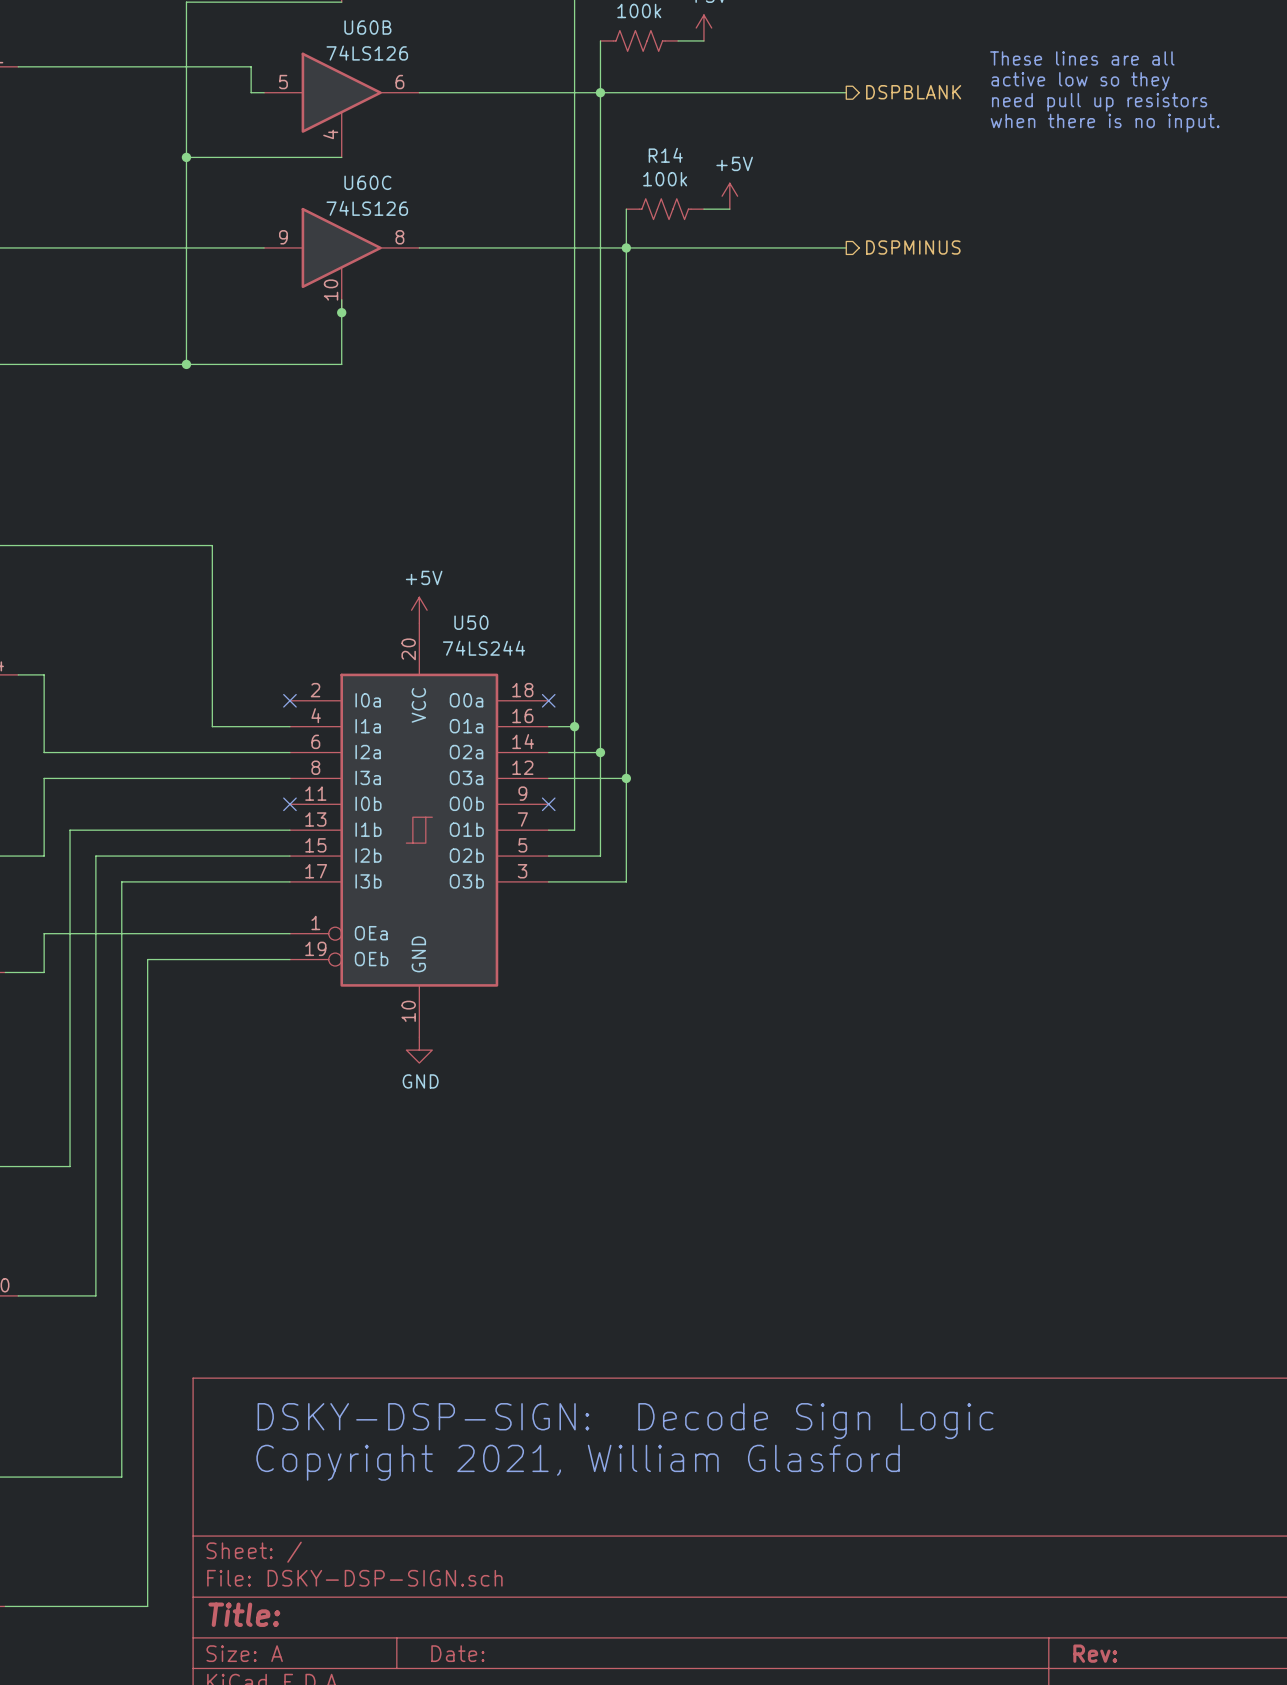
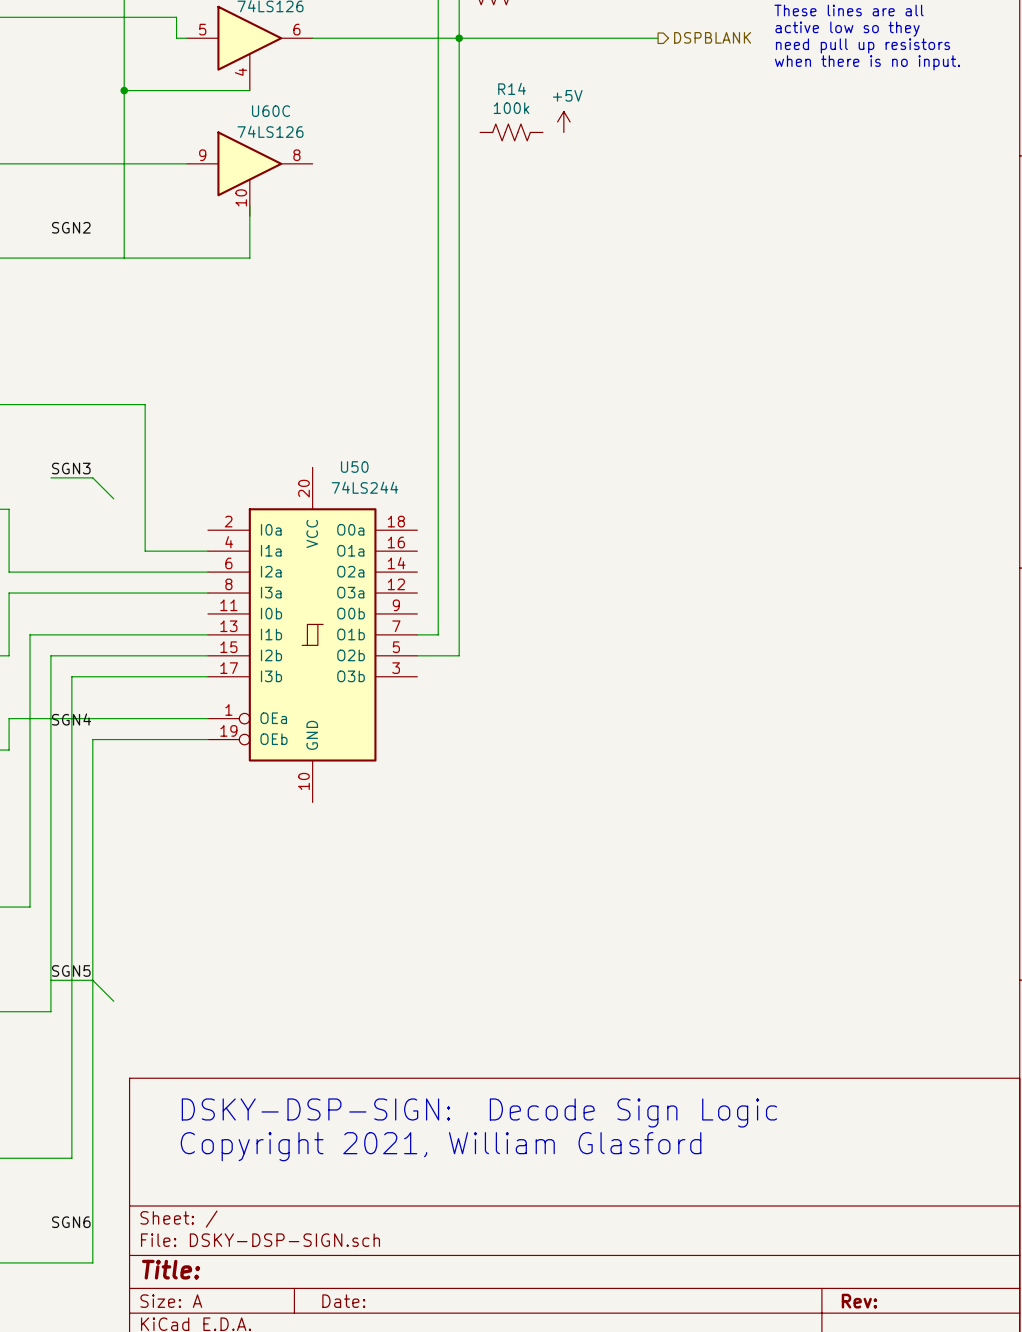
wire: (626, 209) (626, 881) (548, 881) -> none
wire: (703, 209) (729, 209) -> none
wire: (419, 247) (846, 247) -> none
junction: (626, 247) -> none
hierarchical label: DSPMINUS (913, 247) -> none
junction: (341, 312) -> none
label: none -> SGN2 (71, 227)
junction: (186, 364) -> none
power symbol: +5V (419, 610) -> none
label: none -> SGN3 (71, 468)
wire: none -> (50, 477) (92, 477) (113, 498)
no-connect mark: (289, 700) -> none
no-connect mark: (548, 700) -> none
wire: (548, 726) (574, 726) -> none
junction: (574, 726) -> none
wire: (548, 752) (600, 752) -> none
junction: (600, 752) -> none
wire: (548, 778) (626, 778) -> none
junction: (626, 778) -> none
no-connect mark: (289, 804) -> none
no-connect mark: (548, 804) -> none
label: none -> SGN4 (71, 719)
power symbol: GND (419, 1050) -> none
label: none -> SGN5 (71, 970)
wire: none -> (50, 980) (92, 980) (113, 1001)
label: none -> SGN6 (71, 1222)

